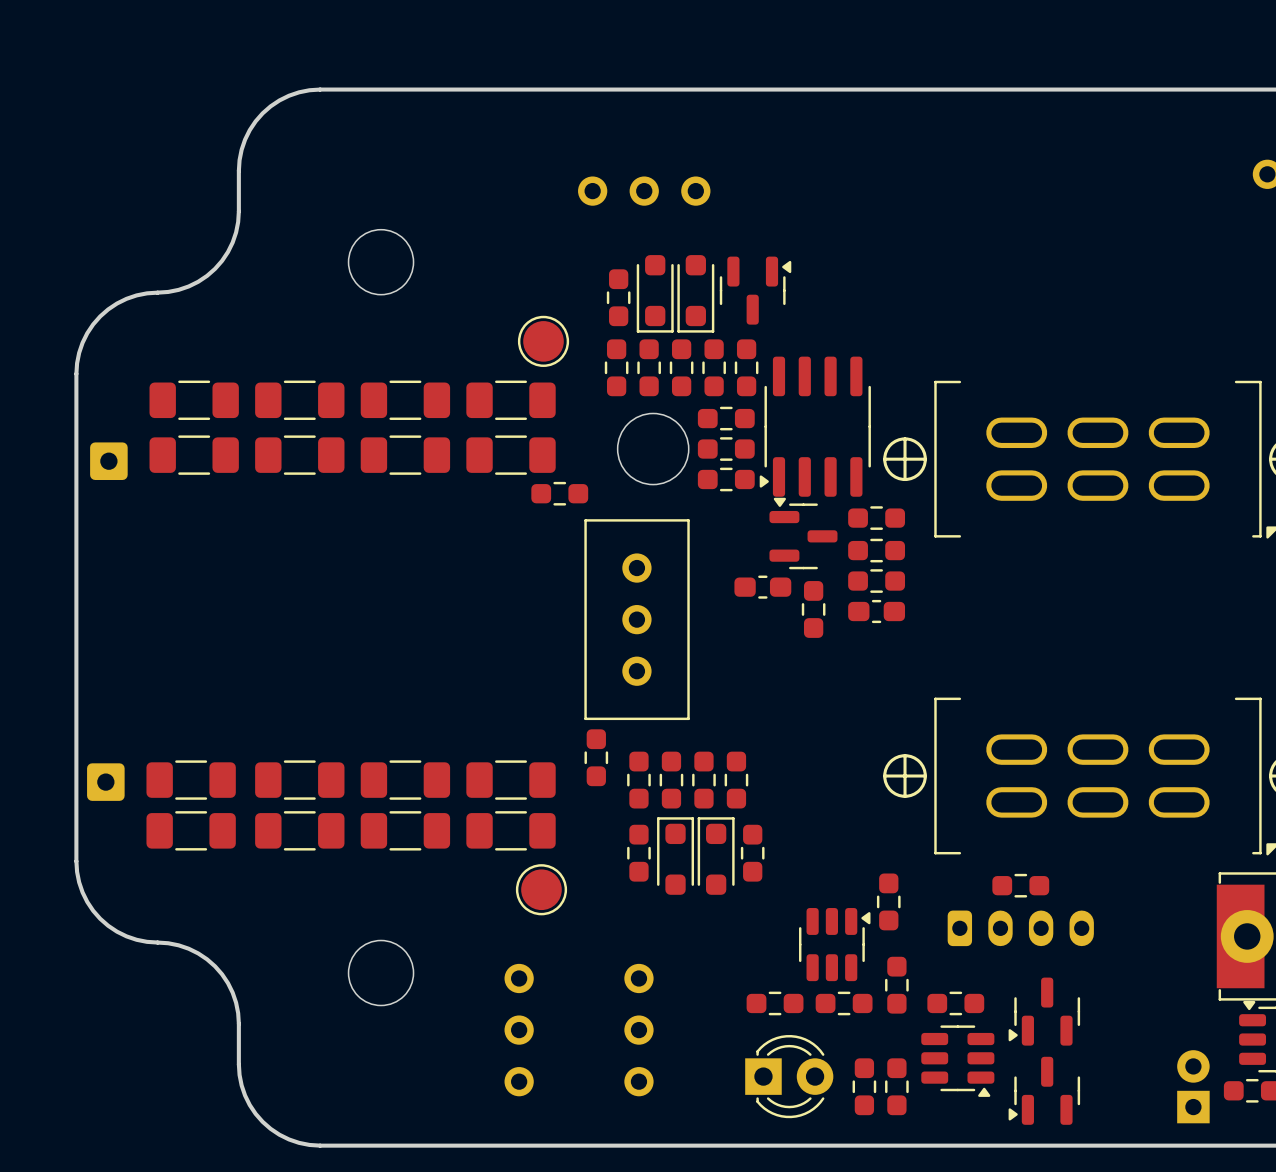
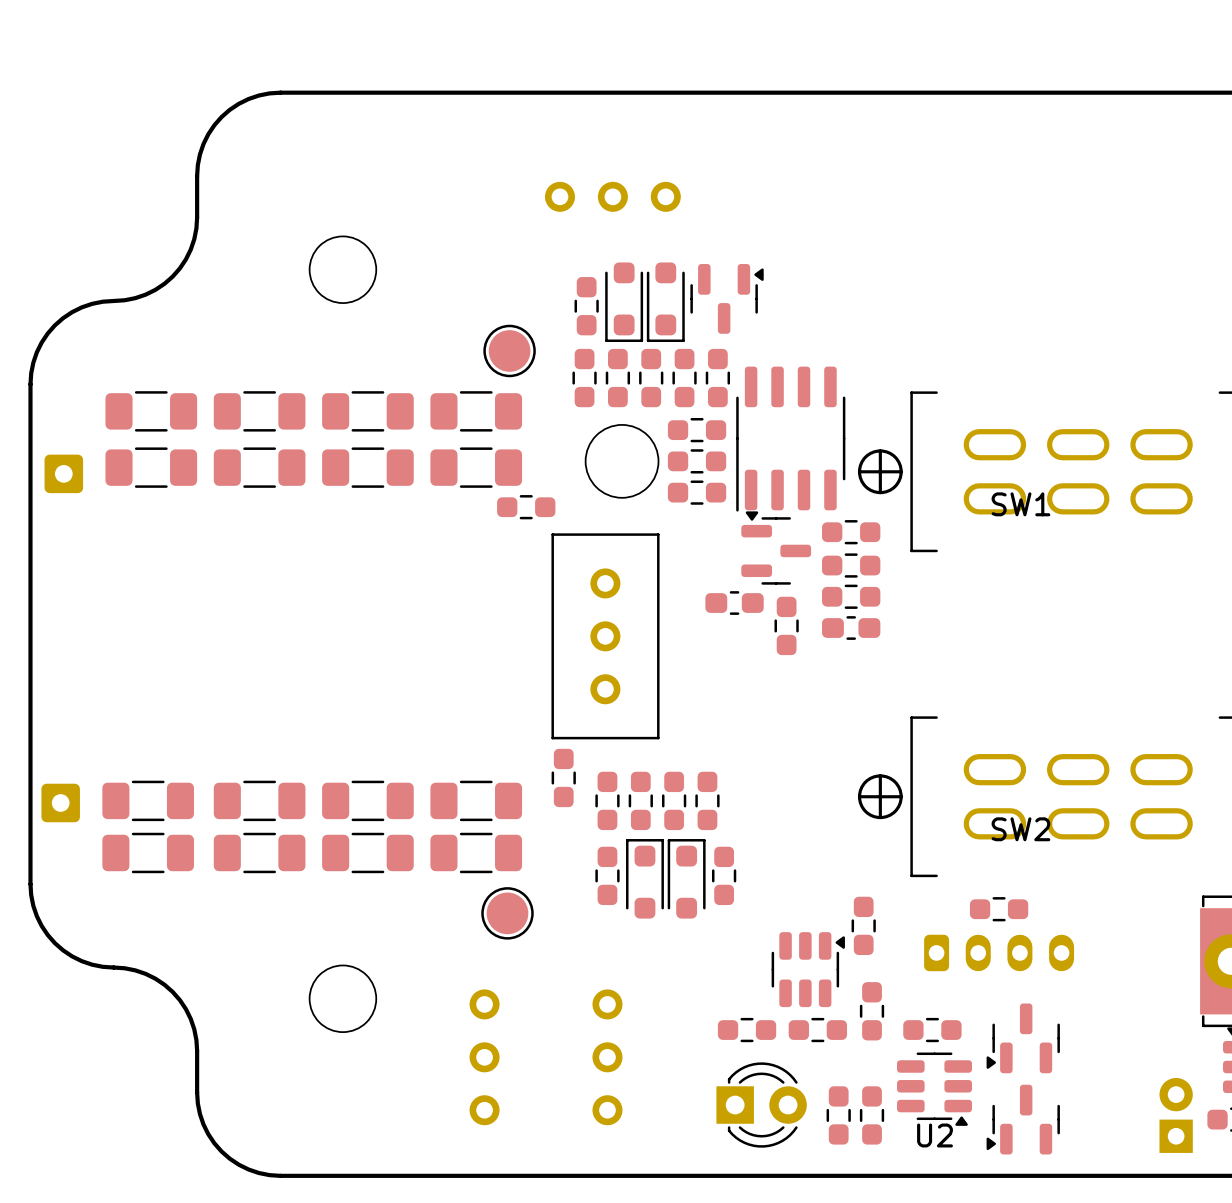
part footprint: [759, 356, 871, 497] -> [736, 366, 846, 512]
SW1 name: none -> SW1 (1020, 504)
SW2 name: none -> SW2 (1020, 829)
U2 name: none -> U2 (935, 1135)

